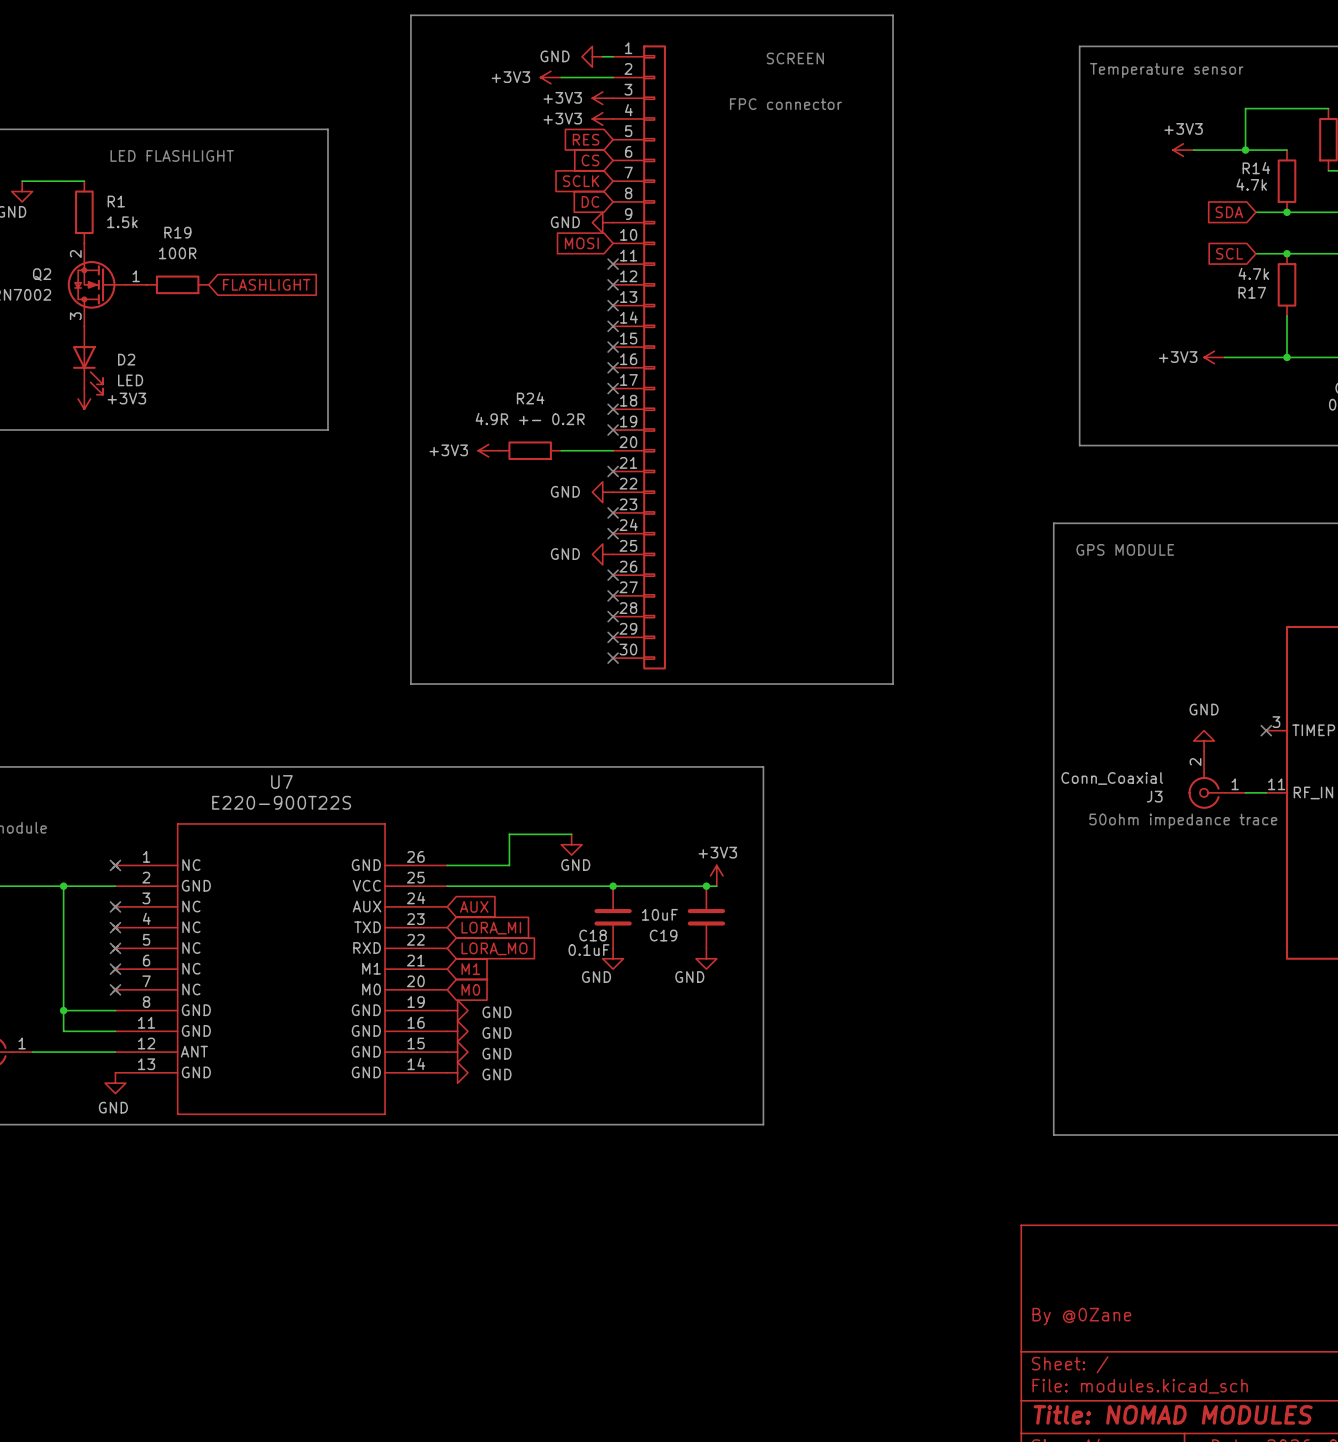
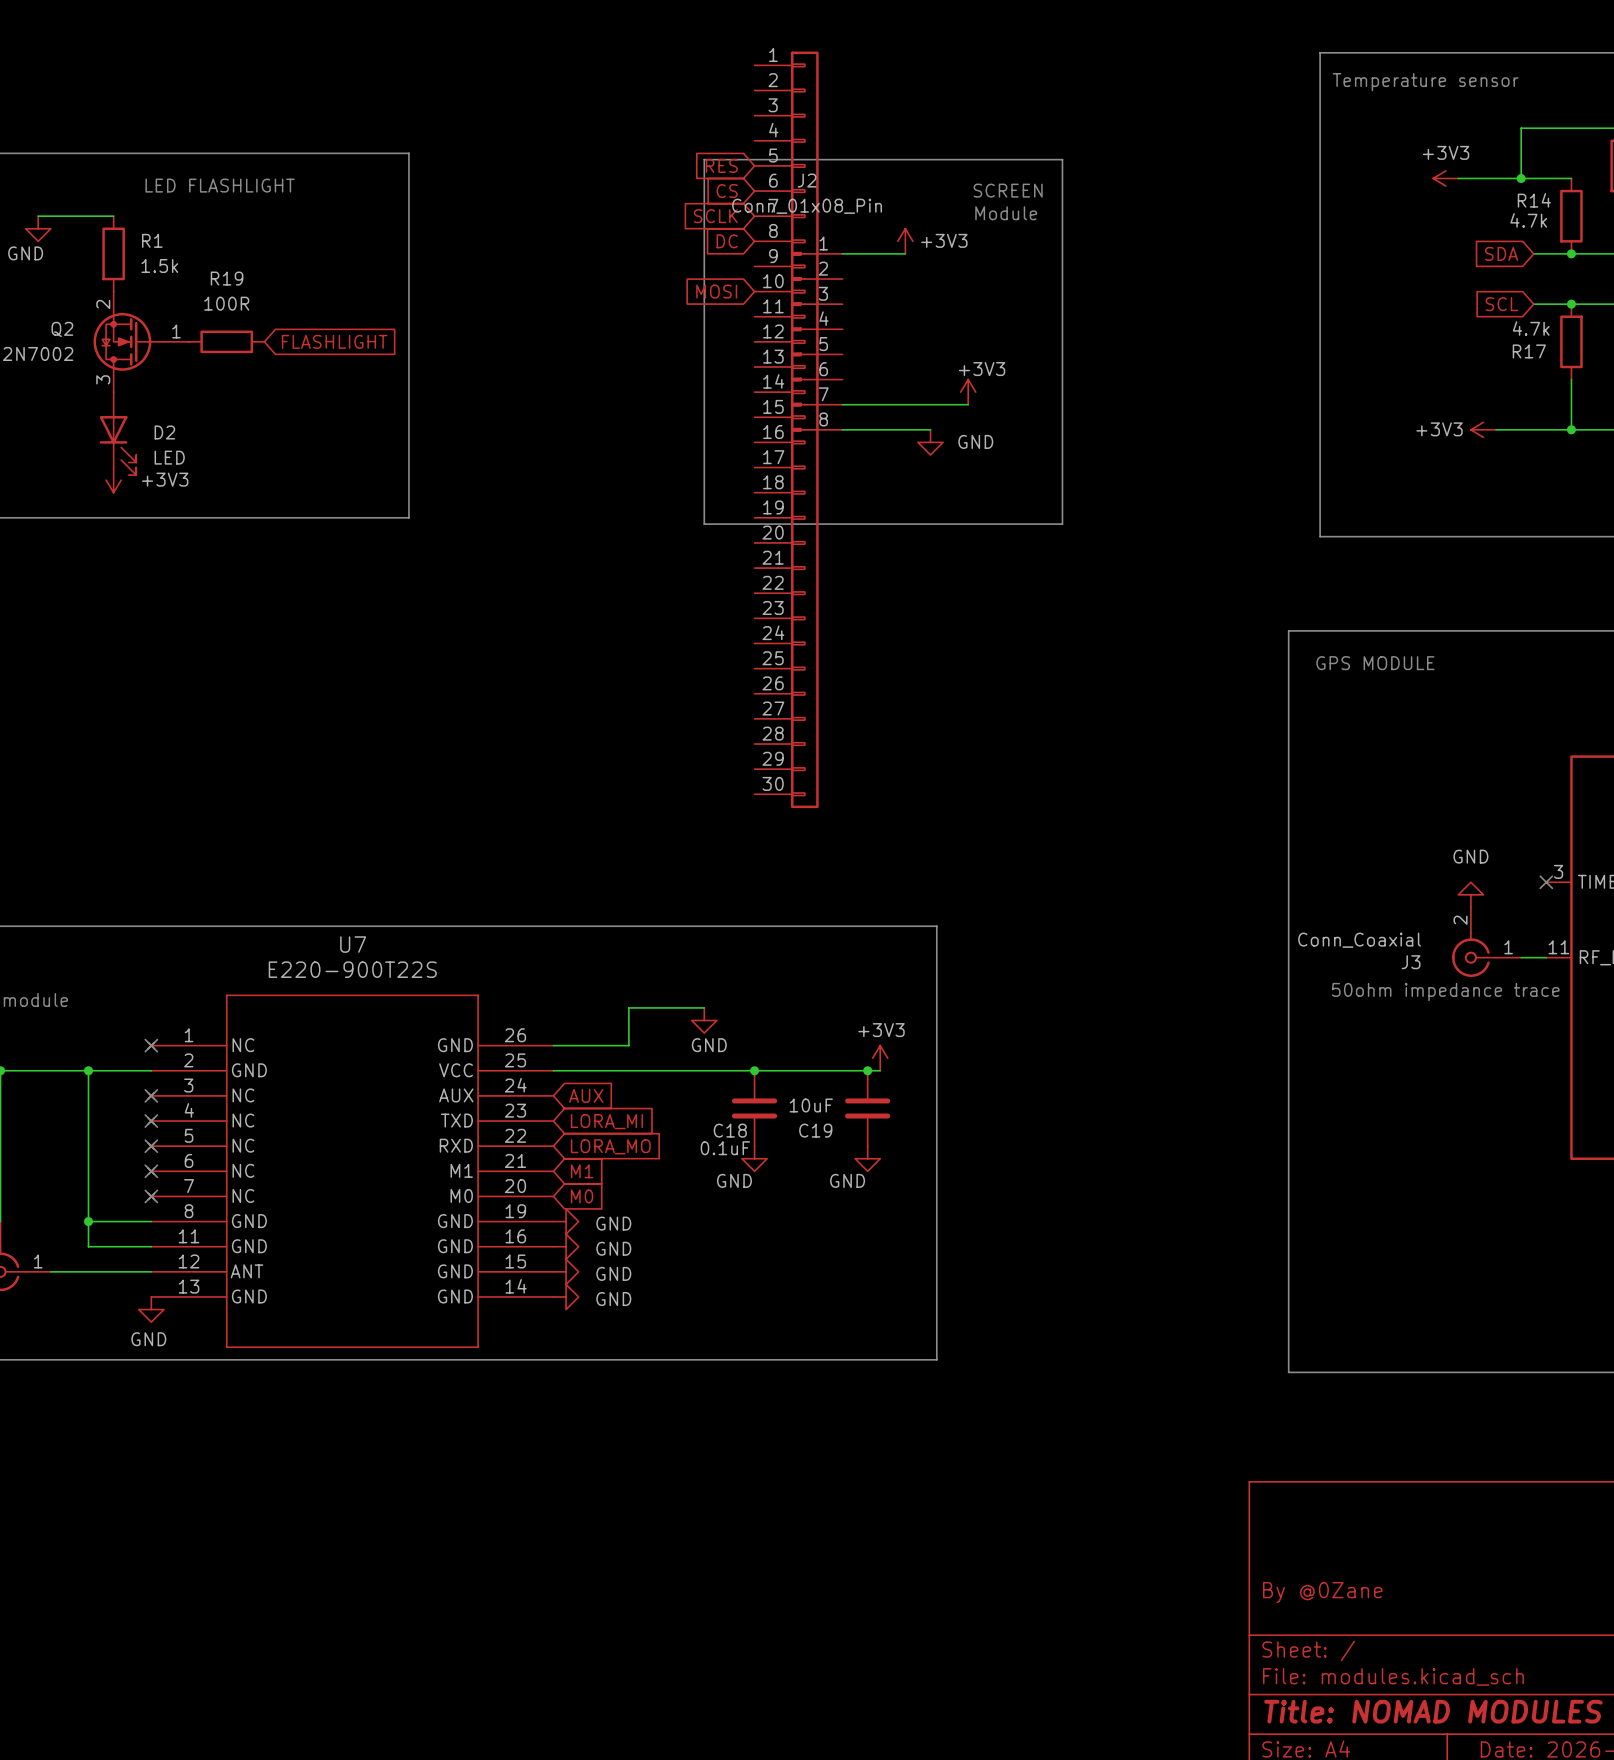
line: (410, 15) (893, 15) (893, 684) (410, 684) (410, 15) -> none
power symbol: GND (592, 56) -> none
wire: (602, 56) (613, 56) -> none
text position: SCREEN (795, 58) -> SCREEN (1008, 190)
power symbol: +3V3 (550, 77) -> none
wire: (561, 77) (613, 77) -> (842, 253) (905, 253)
power symbol: +3V3 (602, 98) -> none
text: FPC connector (785, 104) -> none
power symbol: +3V3 (602, 118) -> none
line: none -> (704, 159) (1062, 159) (1062, 524) (704, 524) (704, 159)
text: none -> Module (1006, 213)
power symbol: none -> +3V3 (905, 241)
power symbol: GND (602, 222) -> none
no-connect mark: (613, 264) -> none
no-connect mark: (613, 284) -> none
J2: none -> Conn_01x08_Pin (817, 341)
no-connect mark: (613, 305) -> none
no-connect mark: (613, 326) -> none
power symbol: none -> +3V3 (968, 392)
wire: none -> (842, 404) (968, 404)
no-connect mark: (613, 347) -> none
wire: none -> (842, 429) (930, 429)
no-connect mark: (613, 367) -> none
power symbol: none -> GND (930, 442)
no-connect mark: (613, 388) -> none
no-connect mark: (613, 409) -> none
no-connect mark: (613, 430) -> none
power symbol: +3V3 (488, 450) -> none
R24: 4.9R +- 0.2R (530, 450) -> none
wire: (561, 450) (613, 450) -> none
no-connect mark: (613, 471) -> none
power symbol: GND (602, 492) -> none
no-connect mark: (613, 512) -> none
no-connect mark: (613, 533) -> none
power symbol: GND (602, 554) -> none
no-connect mark: (613, 575) -> none
no-connect mark: (613, 595) -> none
no-connect mark: (613, 616) -> none
no-connect mark: (613, 637) -> none
no-connect mark: (613, 658) -> none

